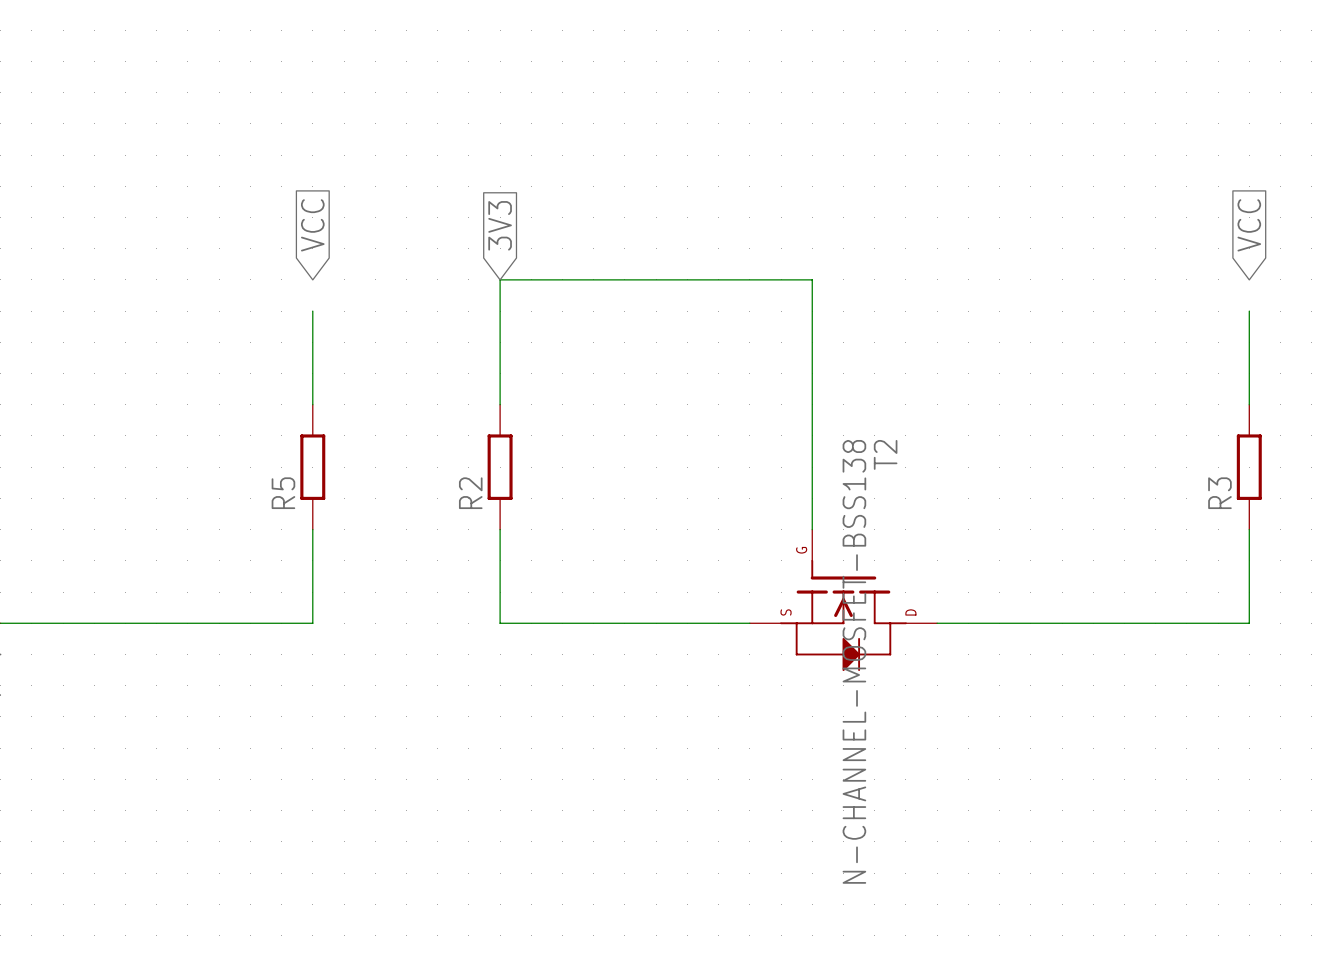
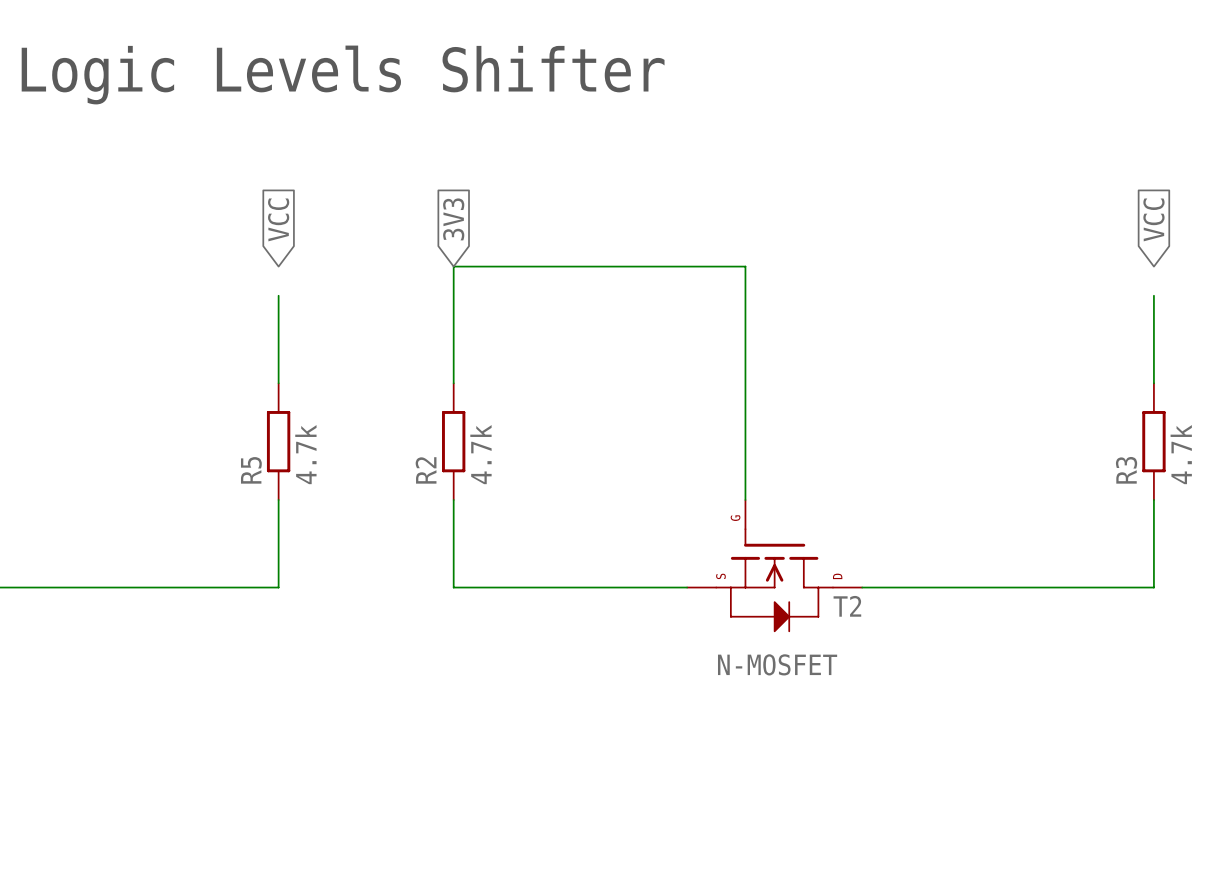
text: none -> Logic Levels Shifter (343, 74)
T2 name rotation: 0° (885, 454) -> 90° clockwise (847, 606)
T2 name position: T2 (885, 454) -> T2 (847, 606)
R5 value: none -> 4.7k (305, 454)
R2 value: none -> 4.7k (480, 454)
R3 value: none -> 4.7k (1181, 454)
T2 value: N-CHANNEL-MOSFET-BSS138 (854, 661) -> N-MOSFET (777, 664)

